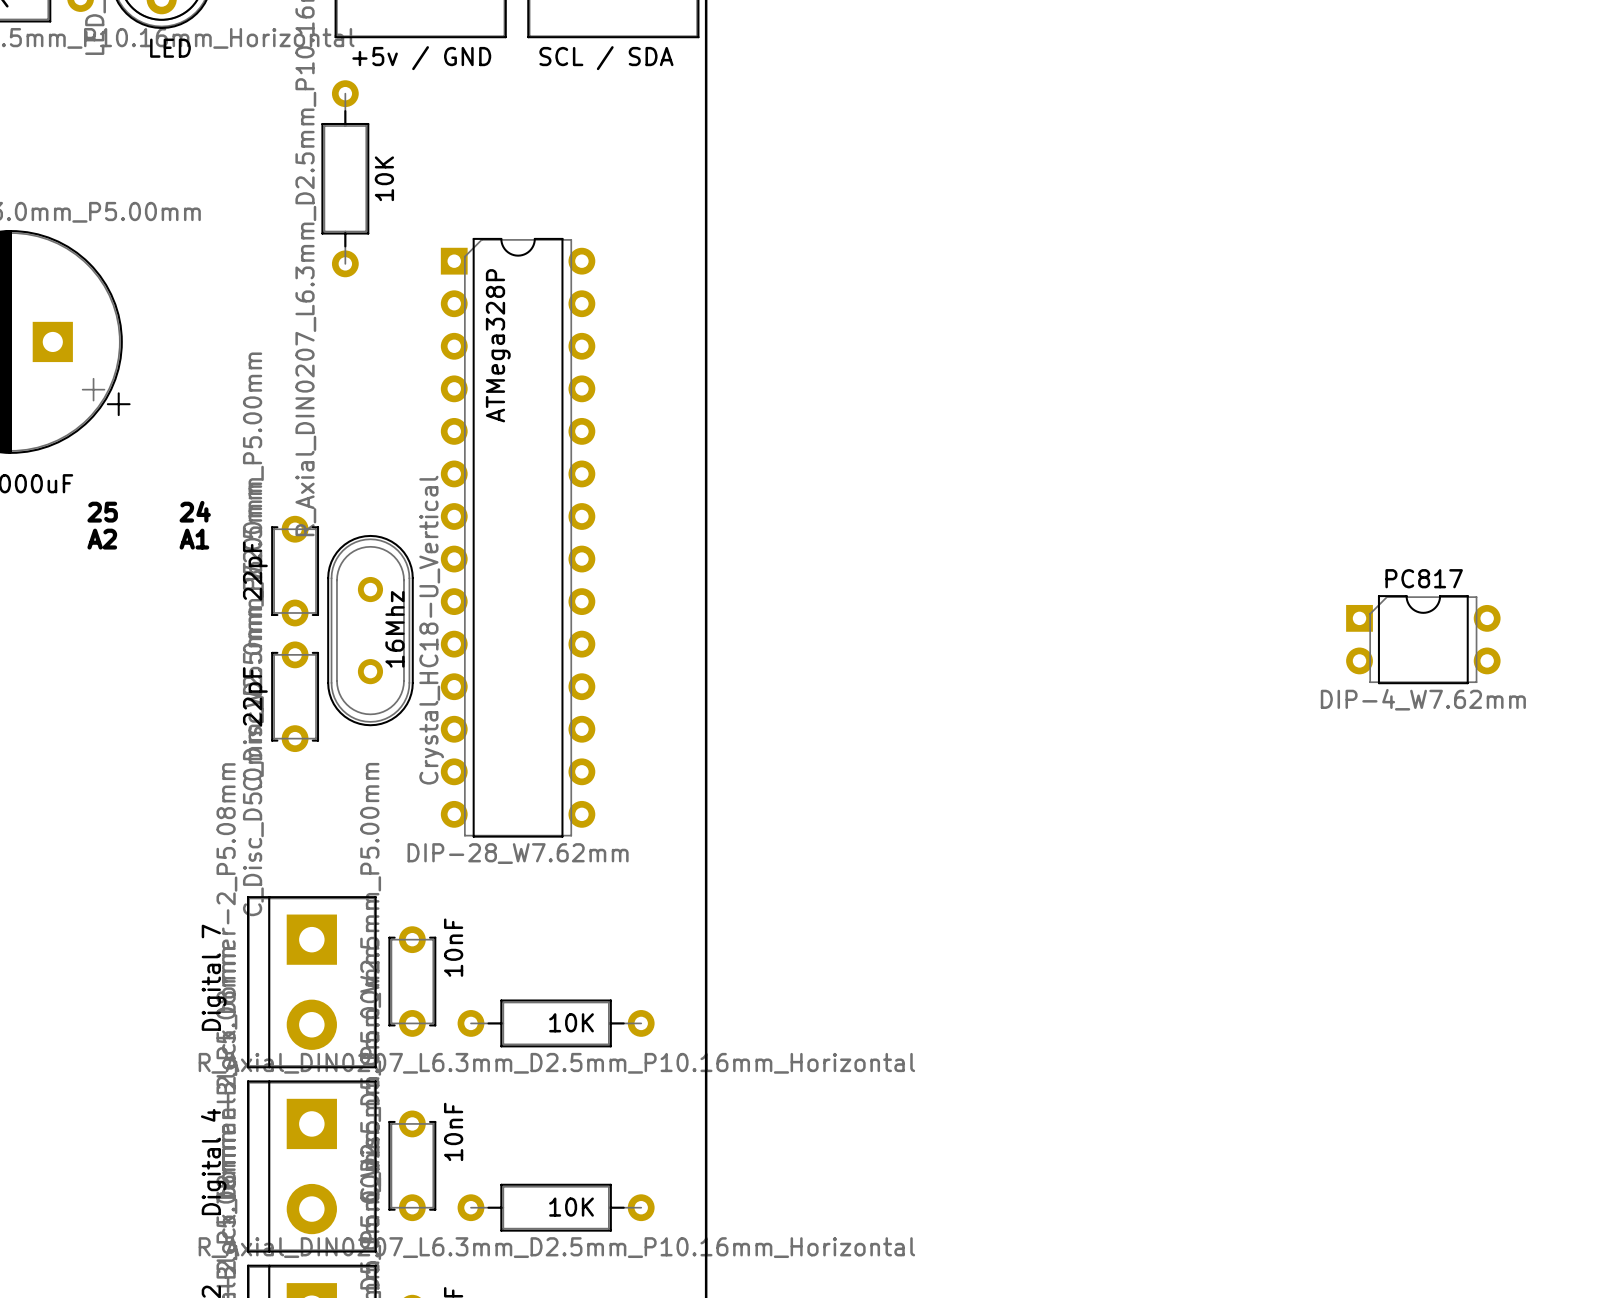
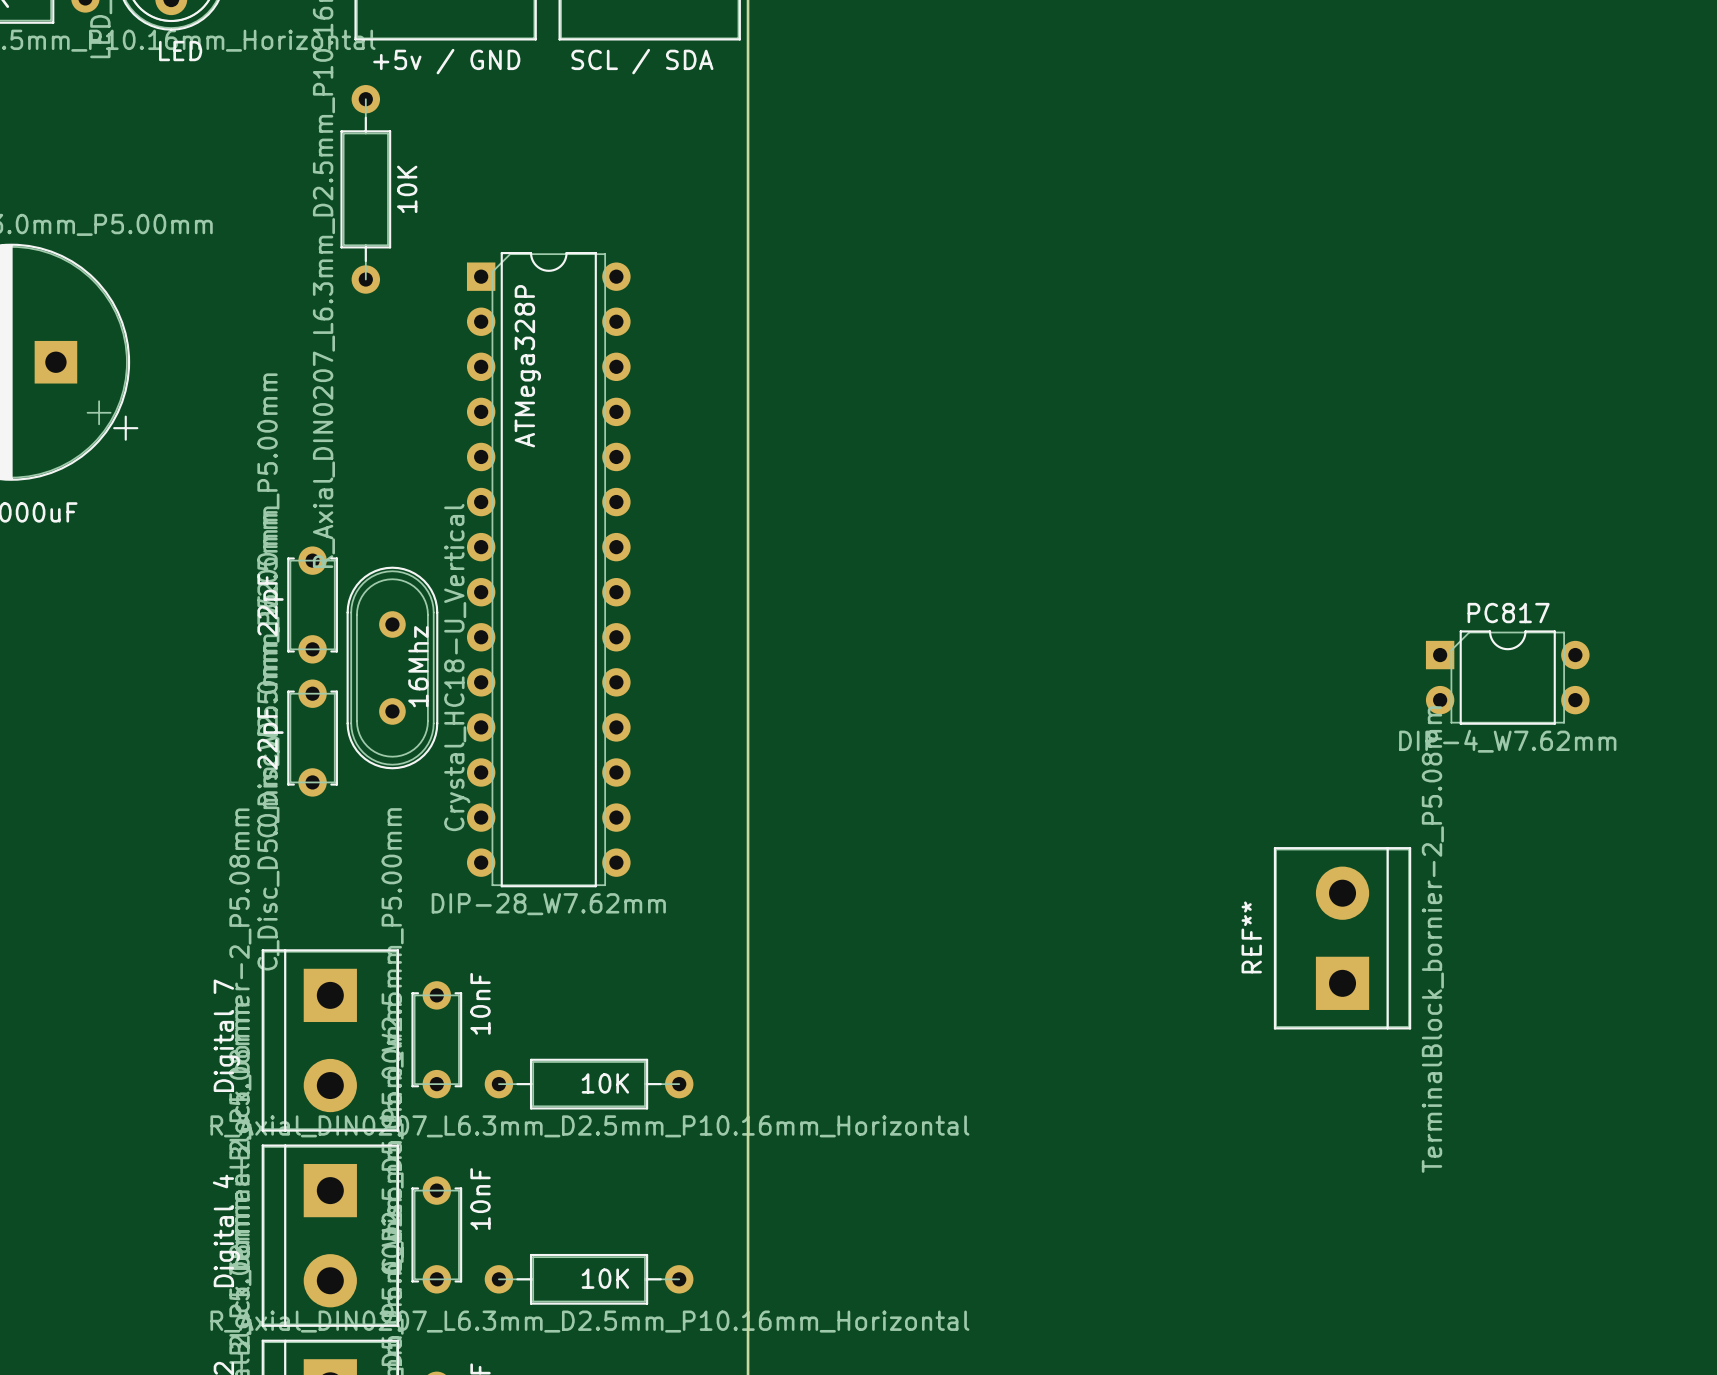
text: 24 (195, 511) -> none
text: 25 (102, 512) -> none
text: A2 (102, 539) -> none
text: A1 (194, 539) -> none
REF**: none -> TerminalBlock_bornier-2_P5.08mm (1342, 938)

